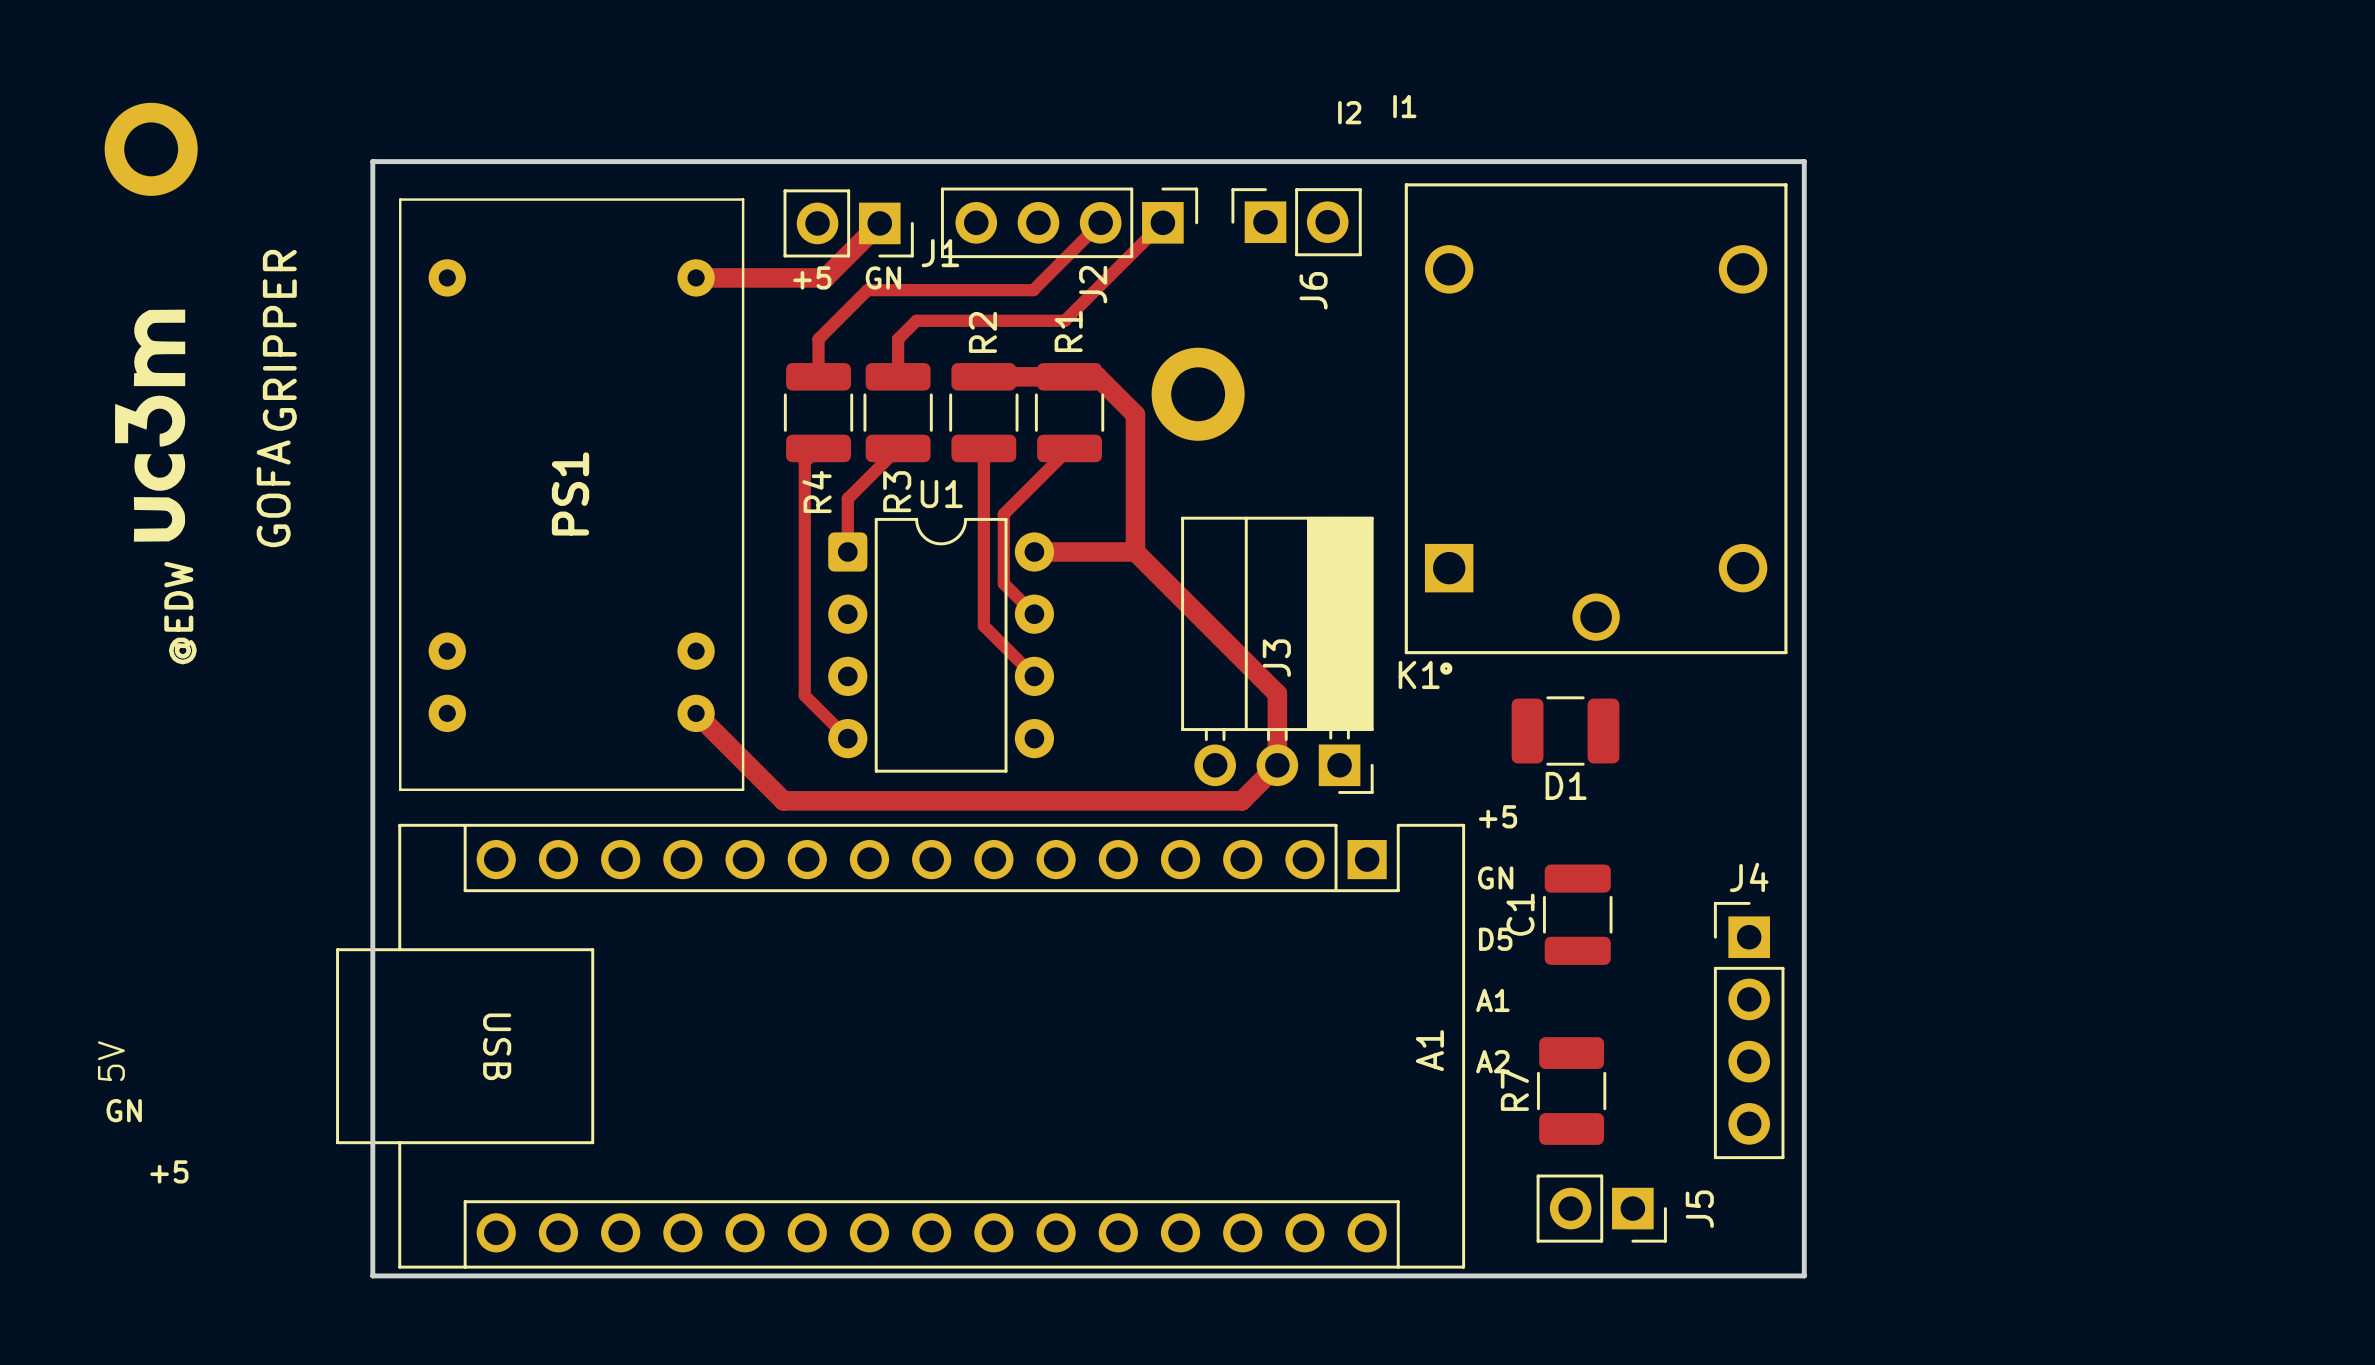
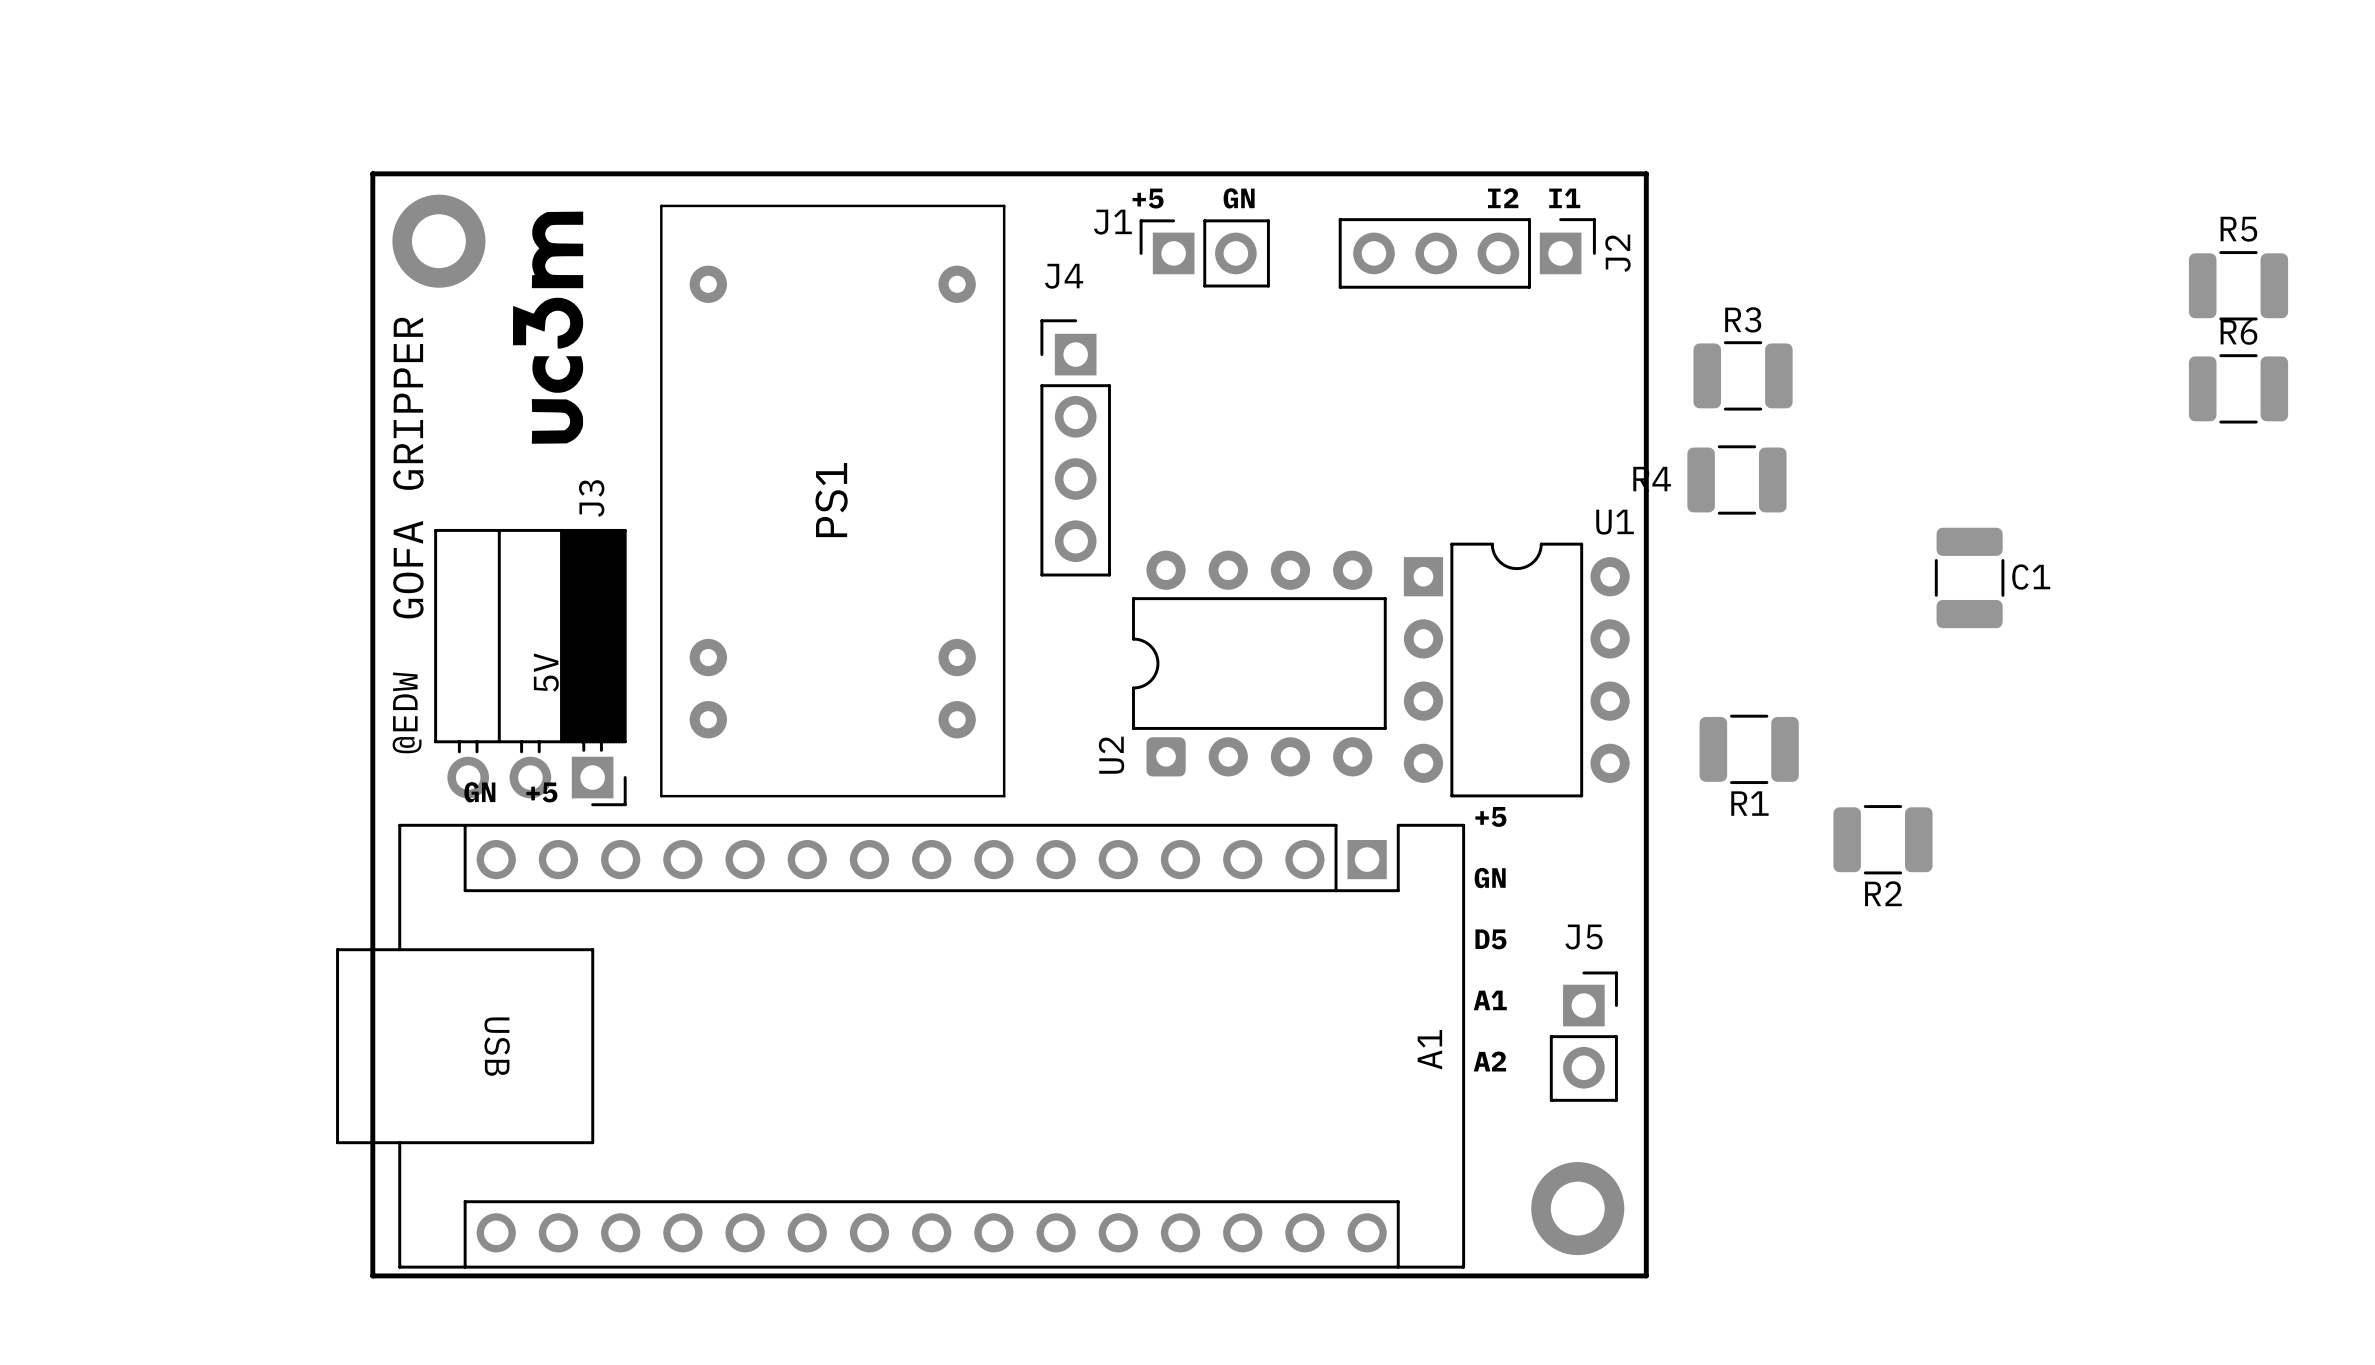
text position: I1 (1404, 106) -> I1 (1564, 198)
text position: I2 (1349, 112) -> I2 (1503, 198)
part position: (151, 149) -> (438, 241)
board edge: (372, 173) (372, 161) (1804, 161) (1804, 1275) (1646, 1275) -> (372, 173) (1646, 173) (1646, 1275)
text: none -> +5 (1148, 198)
text: none -> GN (1239, 198)
J2 position: (1069, 222) -> (1467, 253)
track: (1100, 222) (1033, 290) (867, 290) (818, 339) (818, 376) -> none
track: (1162, 222) (1064, 320) (916, 320) (898, 339) (898, 376) -> none
J6: (1296, 222) -> none
J1 rotation: 0° (848, 223) -> 180° (1204, 253)
J1 position: (848, 223) -> (1204, 253)
track: (879, 223) (825, 277) (696, 277) -> none
text: +5 (812, 277) -> none
text: GN (883, 277) -> none
J2 name position: J2 (1093, 284) -> J2 (1617, 253)
R5: none -> (2238, 285)
R1 name position: R1 (1068, 331) -> R1 (1749, 803)
R2 name position: R2 (982, 332) -> R2 (1883, 893)
text position: GRIPPER (279, 340) -> GRIPPER (408, 403)
track: (983, 376) (1097, 376) (1135, 414) (1135, 551) -> none
R6: none -> (2238, 388)
part: (1198, 394) -> none
R4 rotation: 0° (818, 412) -> 90° clockwise (1736, 479)
R4 position: (818, 412) -> (1736, 479)
R3 rotation: 0° (898, 412) -> 90° clockwise (1743, 375)
R3 position: (898, 412) -> (1743, 375)
R2 rotation: 0° (983, 412) -> 90° clockwise (1882, 839)
R2 position: (983, 412) -> (1882, 839)
R1 rotation: 0° (1069, 412) -> 90° clockwise (1749, 749)
R1 position: (1069, 412) -> (1749, 749)
drawing position: (150, 425) -> (548, 327)
K1: (1596, 428) -> none
track: (818, 448) (804, 462) (804, 695) (847, 738) -> none
track: (898, 448) (847, 498) (847, 551) -> none
track: (983, 448) (983, 625) (1034, 676) -> none
track: (1069, 448) (1003, 514) (1003, 583) (1034, 614) -> none
R3 name position: R3 (897, 491) -> R3 (1743, 319)
text position: GOFA (273, 493) -> GOFA (408, 569)
PS1 position: (571, 494) -> (832, 501)
U1 name position: U1 (941, 494) -> U1 (1615, 522)
U1 footprint: [828, 517, 1055, 773] -> [1403, 542, 1630, 798]
track: (1034, 551) (1135, 551) -> none
track: (1135, 551) (1277, 693) (1277, 765) (1241, 800) (783, 800) (696, 713) -> none
text position: @EDW (180, 613) -> @EDW (407, 712)
J3 position: (1277, 655) -> (530, 667)
J3 name position: J3 (1276, 658) -> J3 (591, 498)
U2: none -> (1259, 663)
D1: (1565, 731) -> none
text: none -> GN (479, 792)
text: none -> +5 (541, 792)
J4 name position: J4 (1749, 877) -> J4 (1064, 276)
C1 name rotation: 0° (1520, 914) -> 90° clockwise (2031, 577)
C1 name position: C1 (1520, 914) -> C1 (2031, 577)
C1 position: (1577, 914) -> (1969, 577)
J4 position: (1749, 1030) -> (1075, 447)
text position: 5V (111, 1061) -> 5V (546, 672)
R7: (1571, 1091) -> none
text: GN (124, 1110) -> none
text: +5 (169, 1171) -> none
part: none -> (1577, 1208)
J5 rotation: 0° (1601, 1208) -> 90° counterclockwise (1583, 1036)
J5 position: (1601, 1208) -> (1583, 1036)

